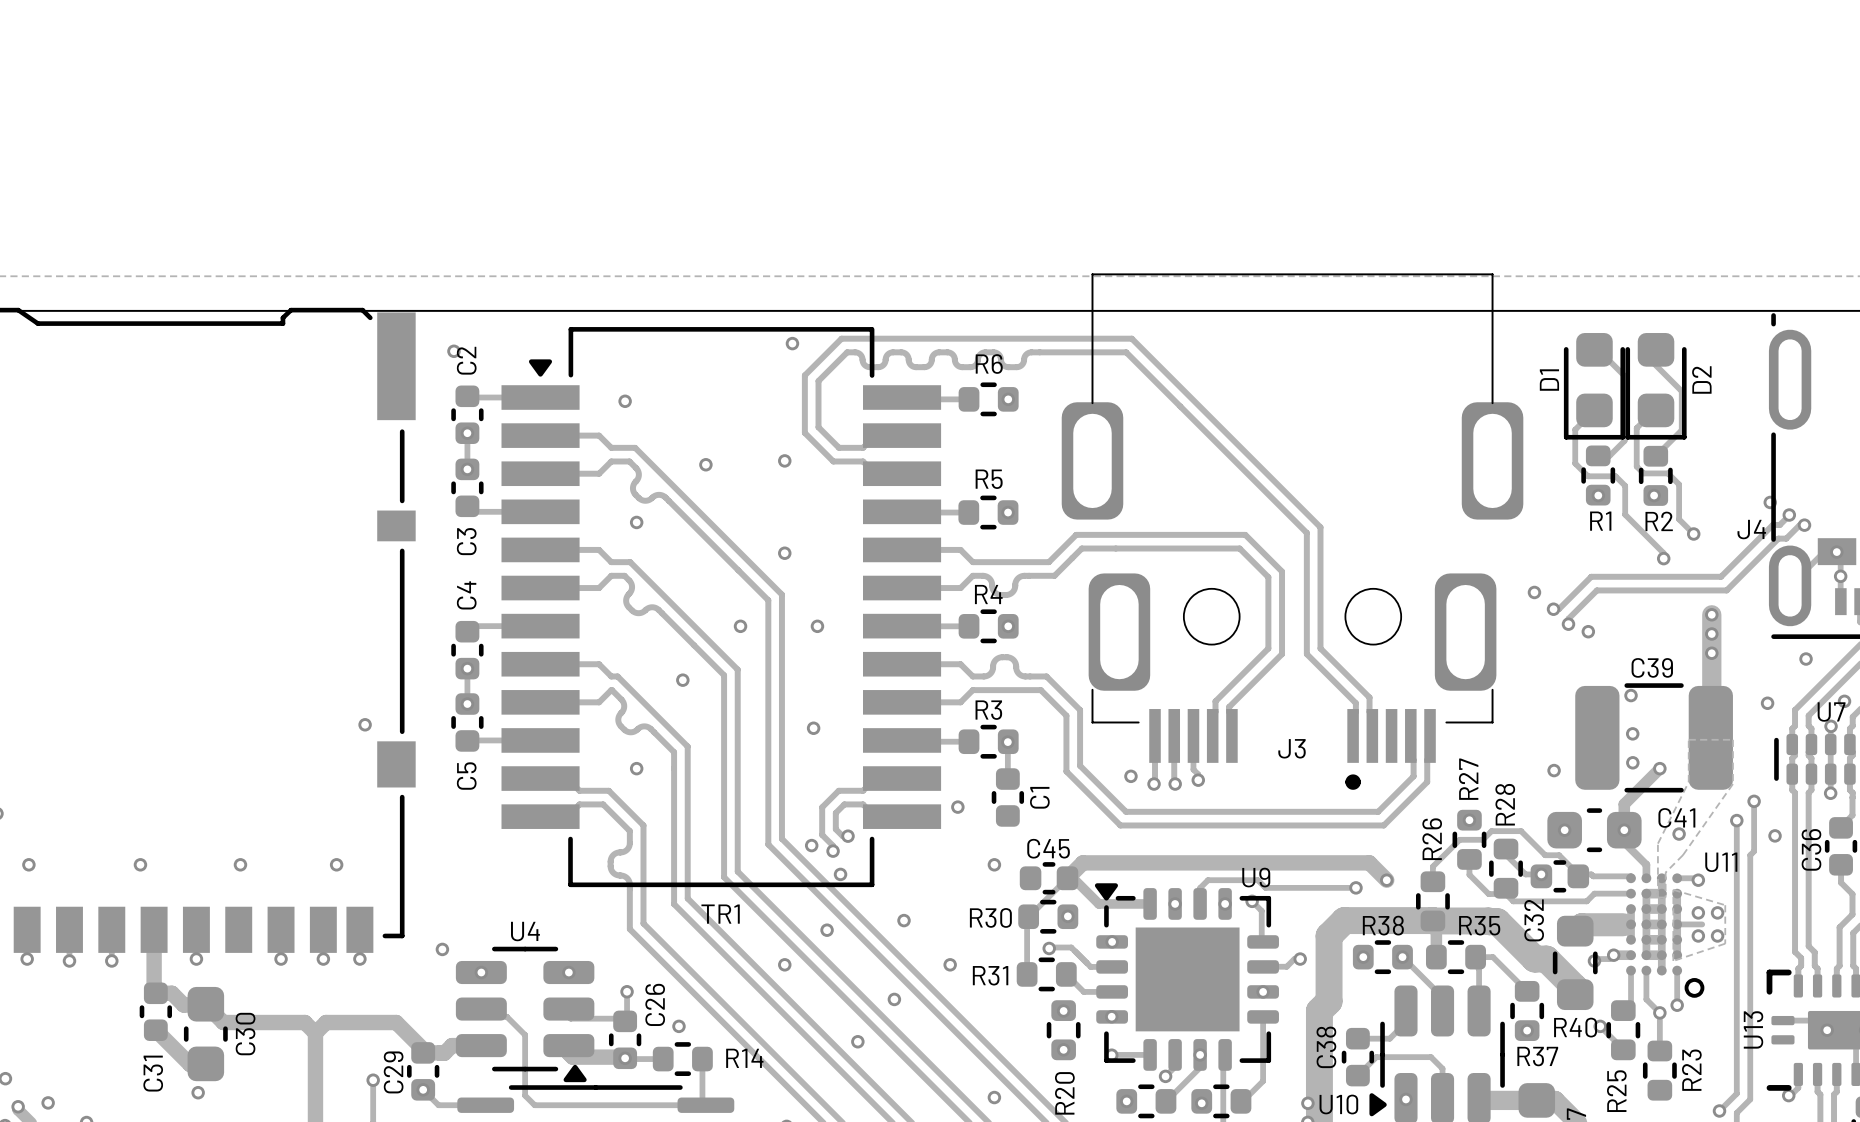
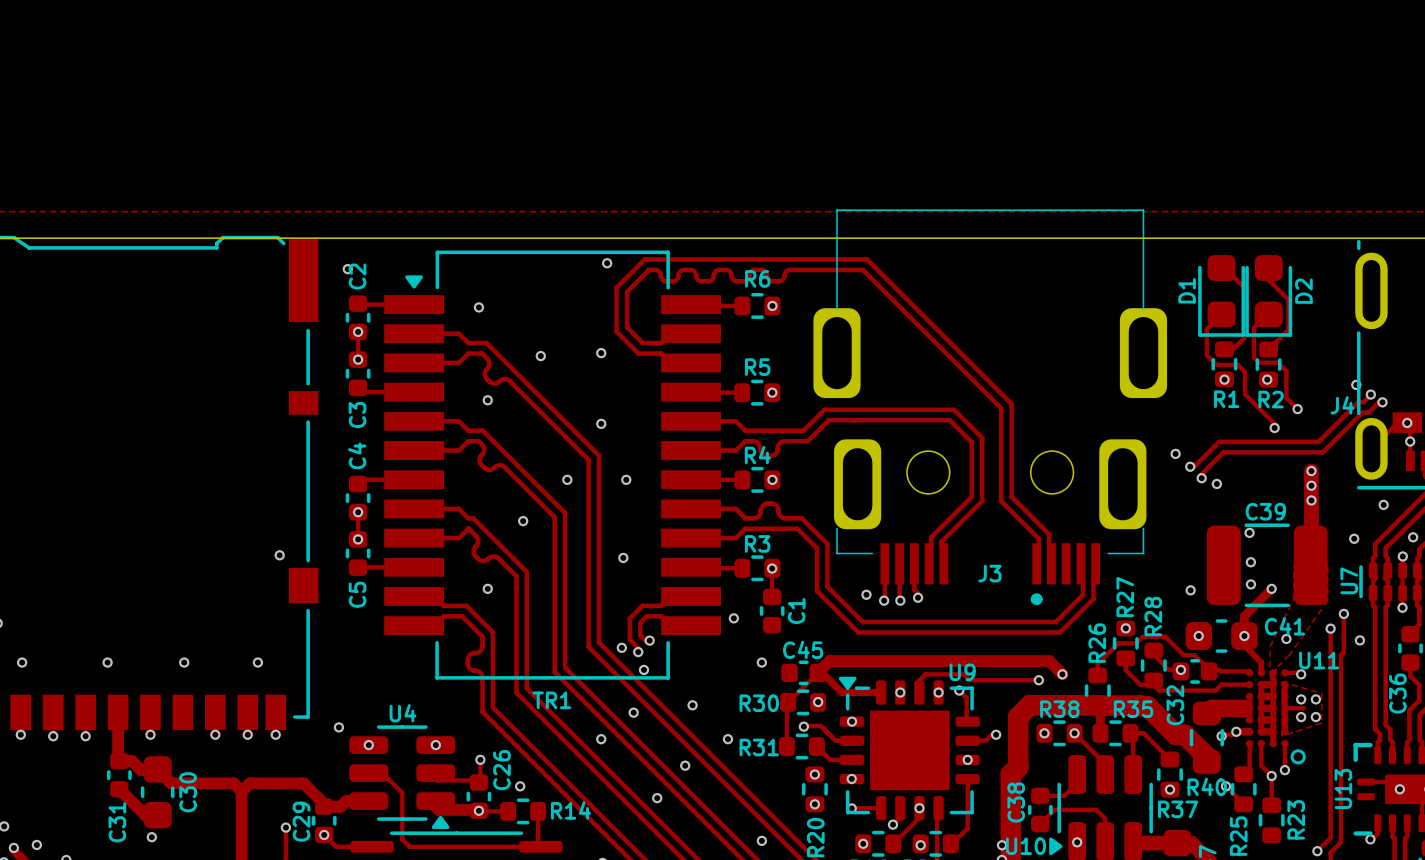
U7 name rotation: 0° (1831, 712) -> 90° counterclockwise (1349, 580)
U7 name position: U7 (1831, 712) -> U7 (1349, 580)
C36 name position: C36 (1811, 849) -> C36 (1397, 693)

